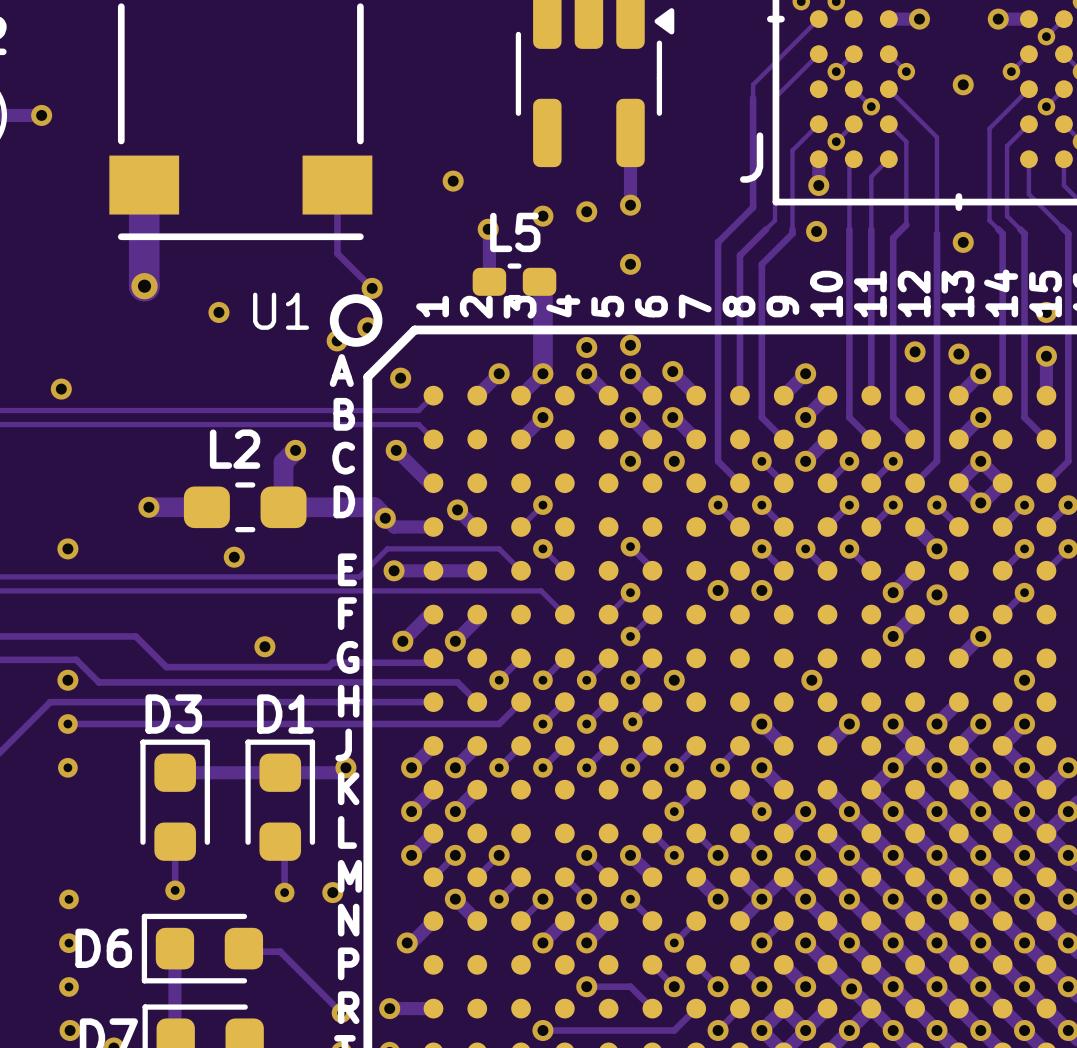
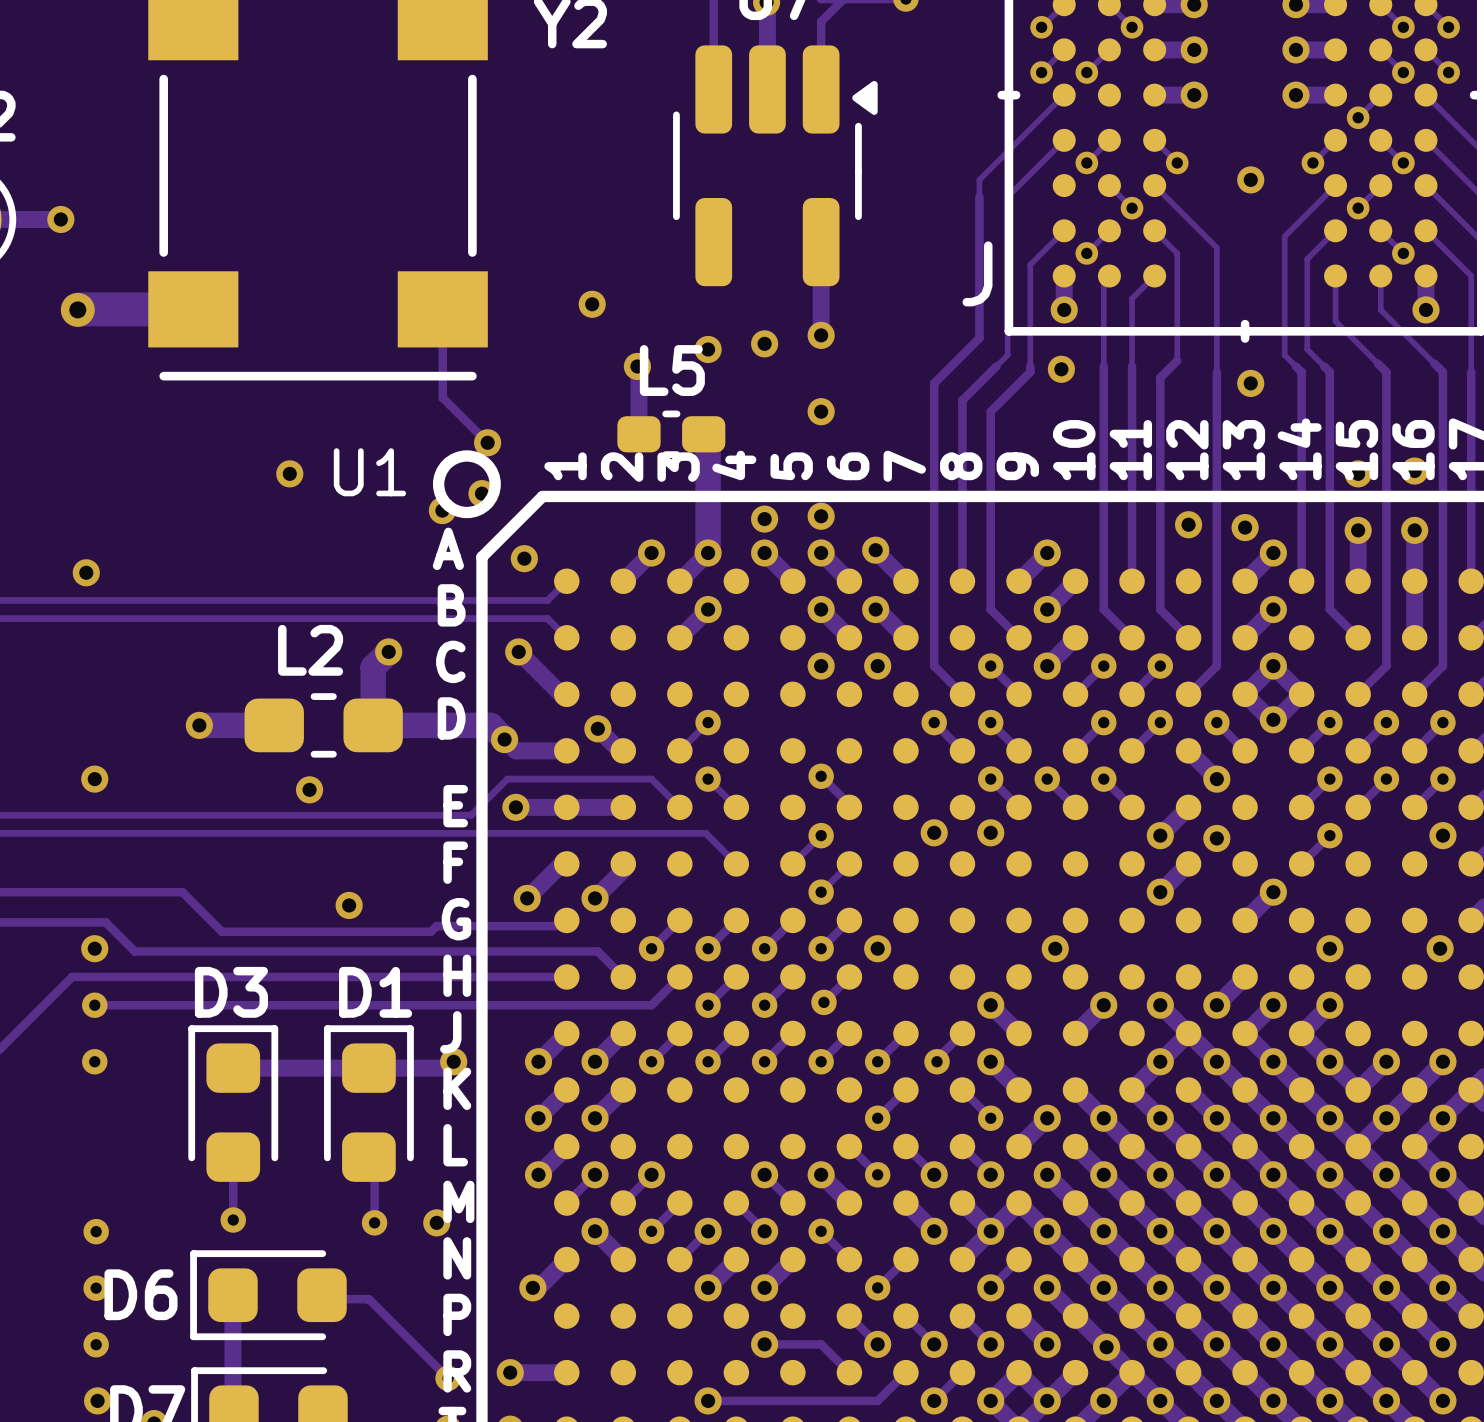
track: (144, 185) (144, 285) -> (193, 309) (78, 309)
via position: (144, 286) -> (77, 309)

